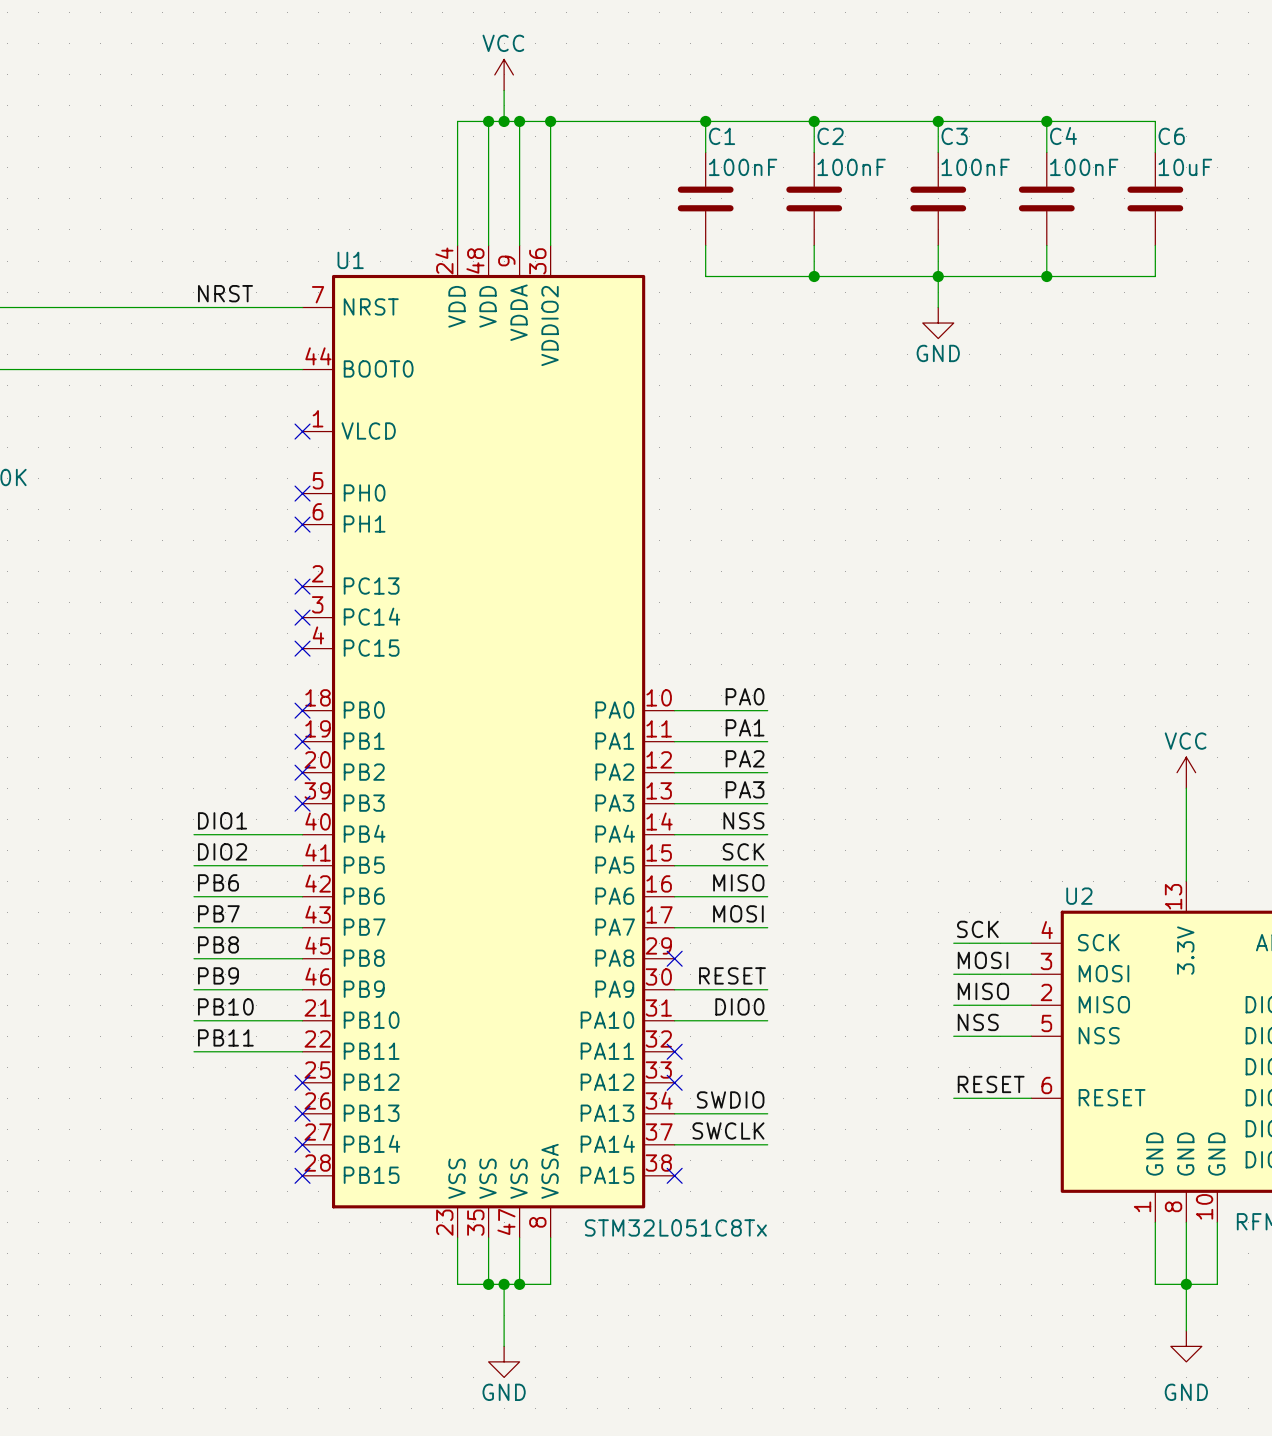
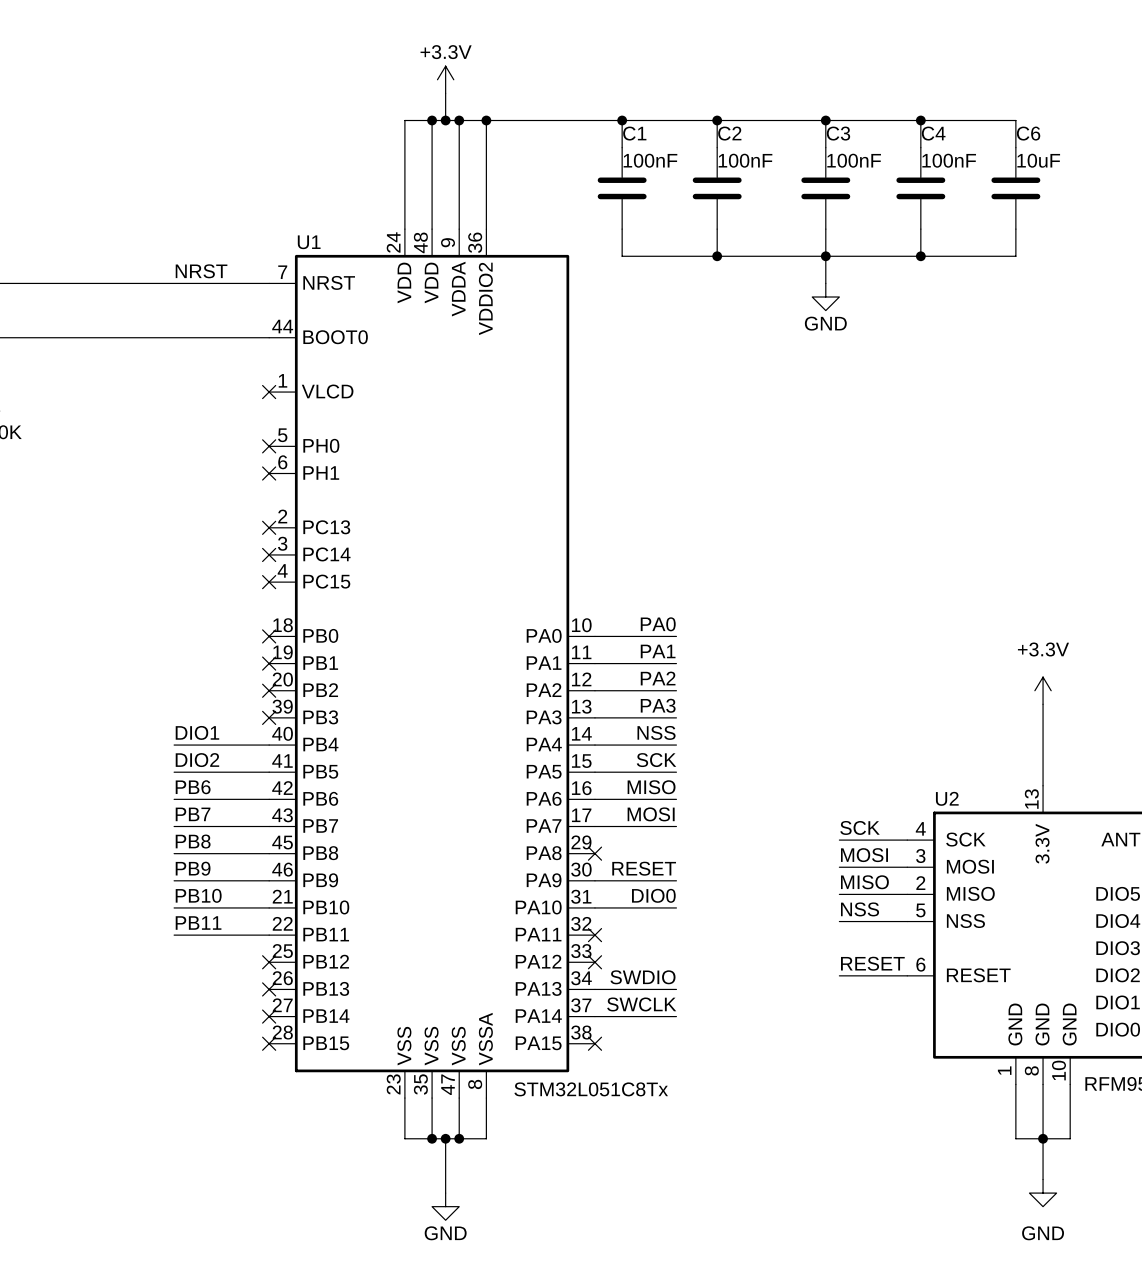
power symbol: VCC (504, 74) -> +3.3V (445, 79)
power symbol: VCC (1186, 772) -> +3.3V (1043, 690)

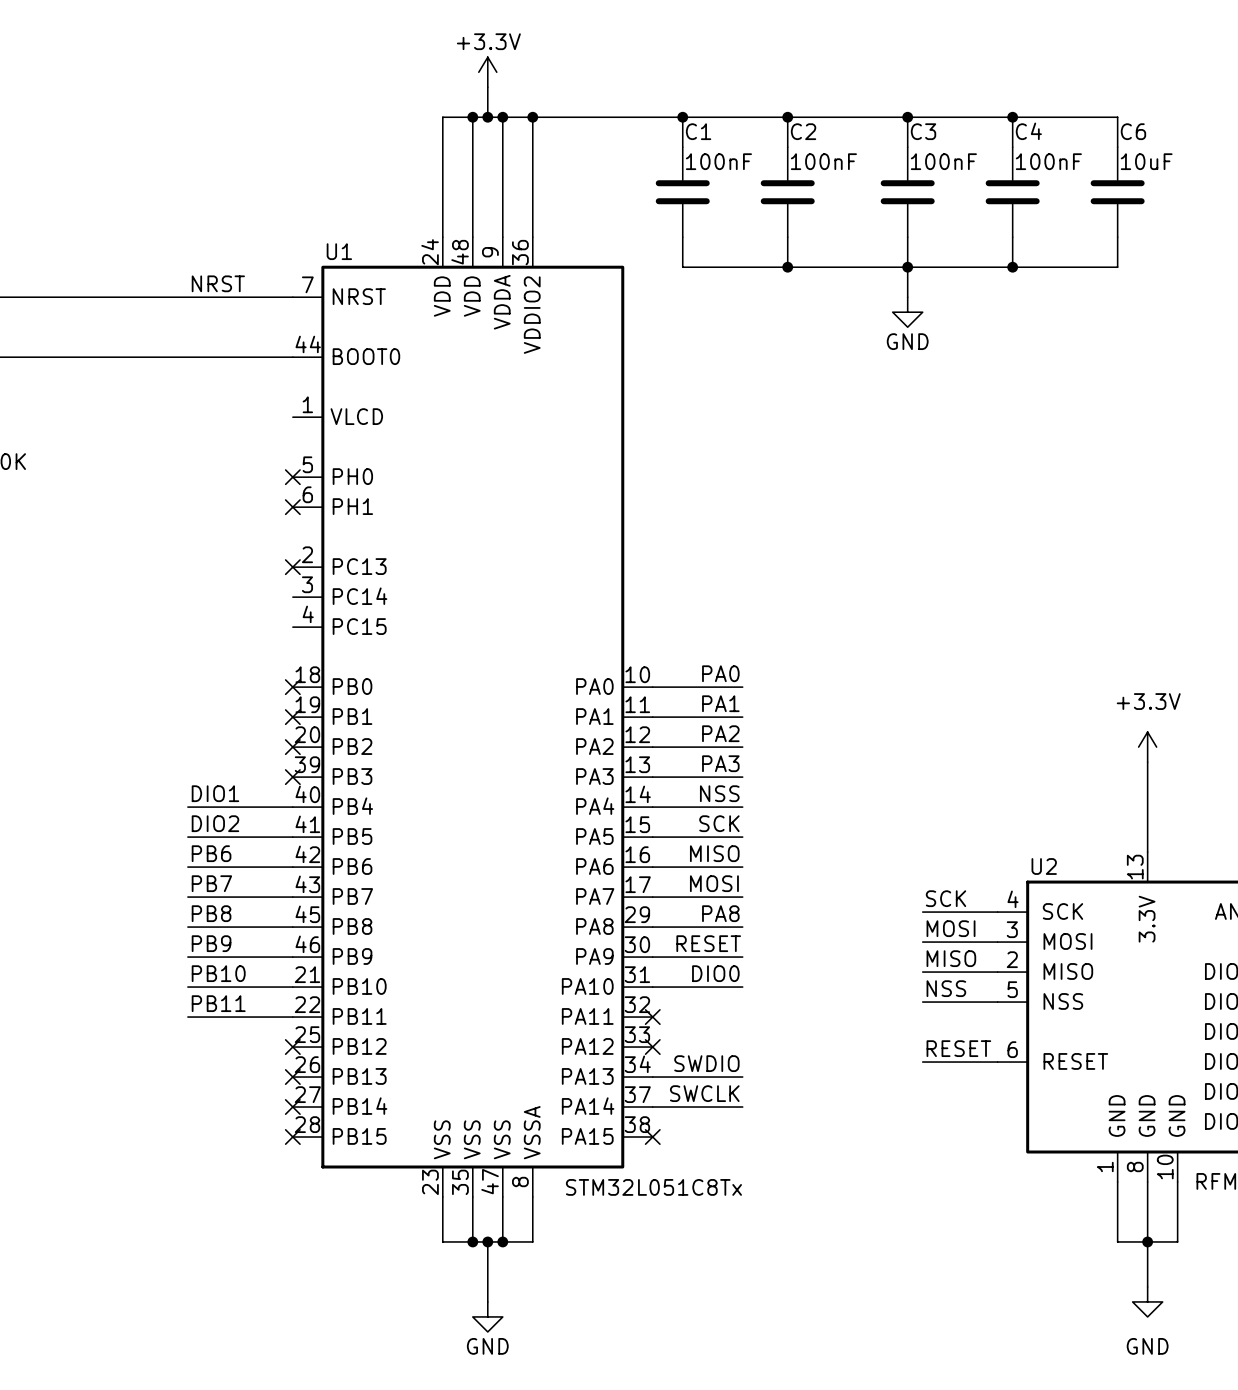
no-connect mark: (269, 392) -> none
no-connect mark: (269, 554) -> none
no-connect mark: (269, 582) -> none
label: none -> PA8 (720, 913)
wire: none -> (652, 927) (742, 927)
no-connect mark: (594, 853) -> none

